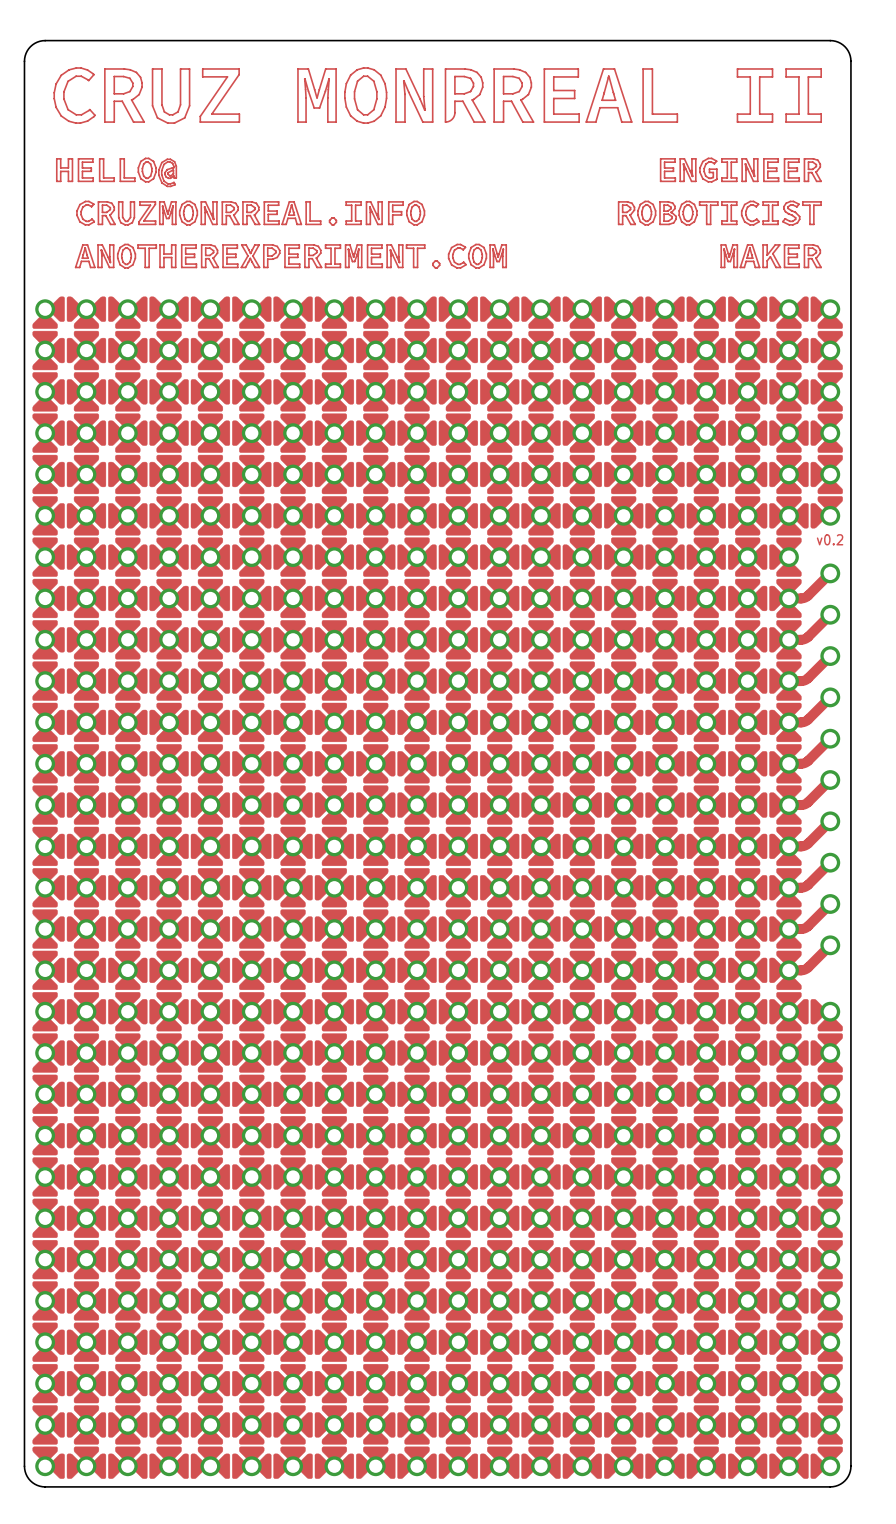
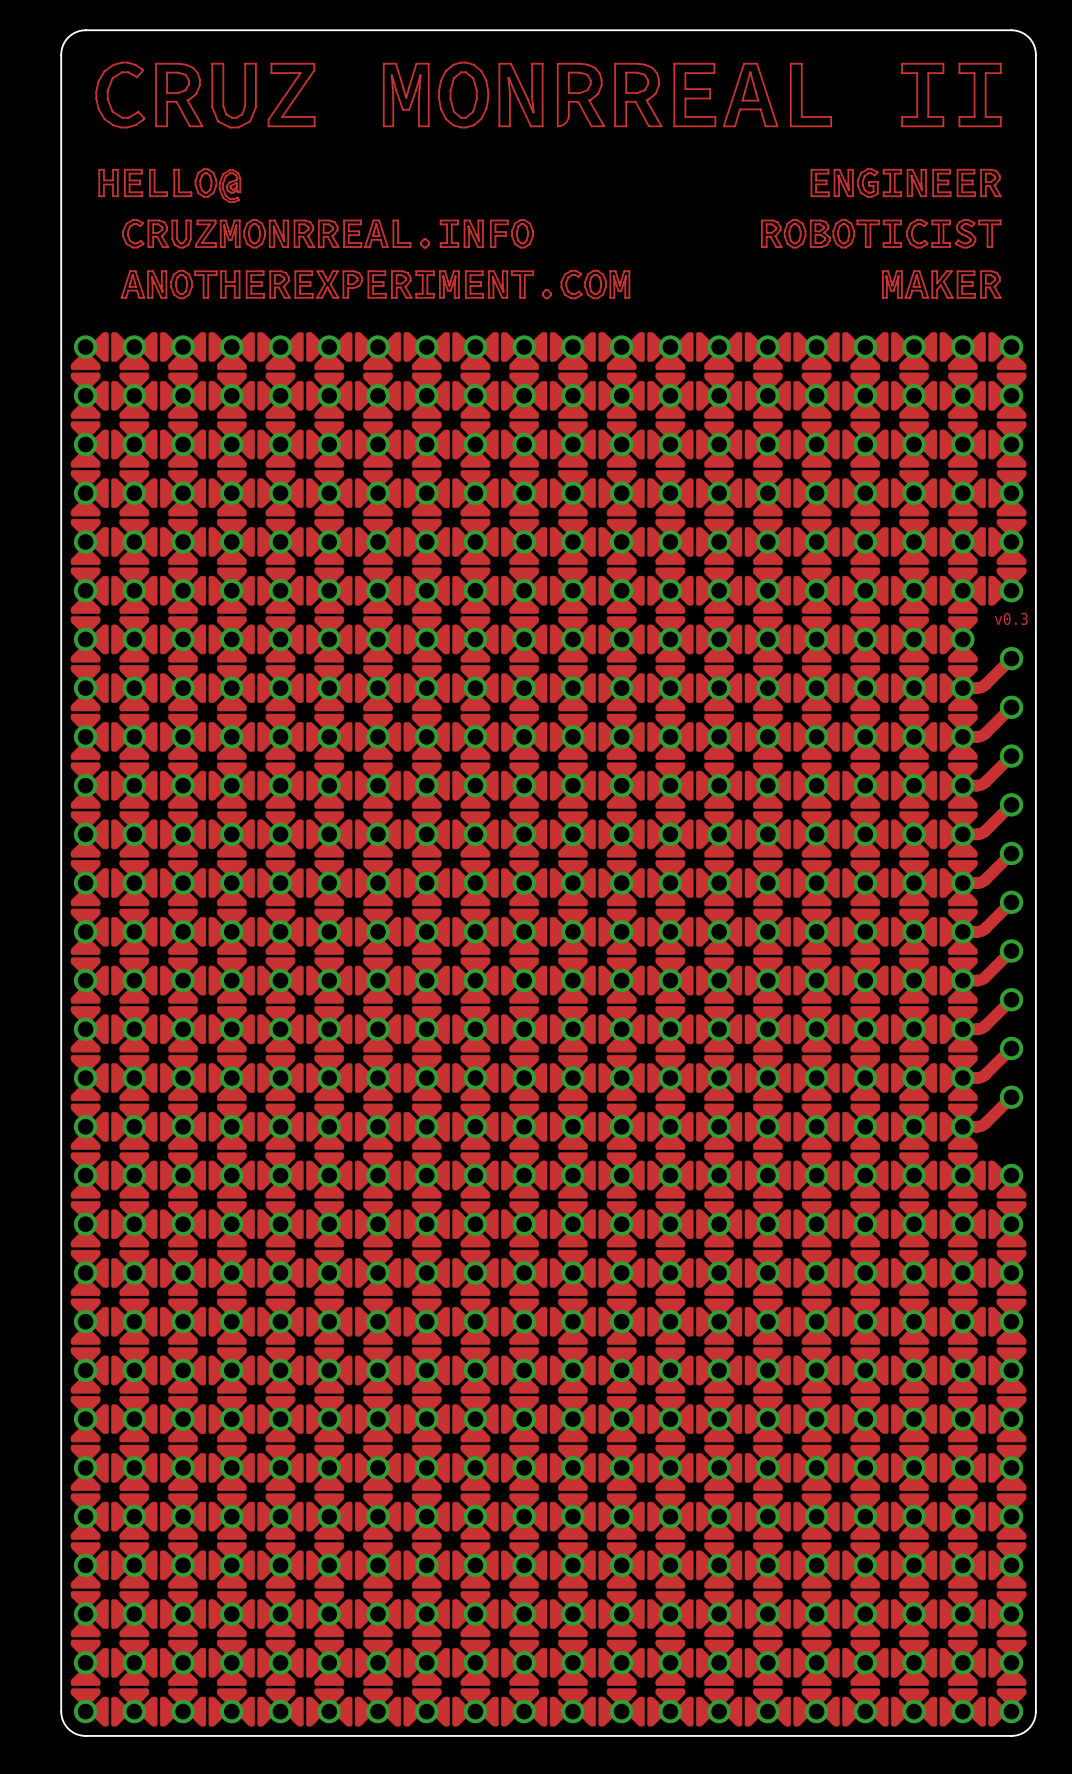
text: v0.2 (830, 539) -> v0.3 (1011, 618)

